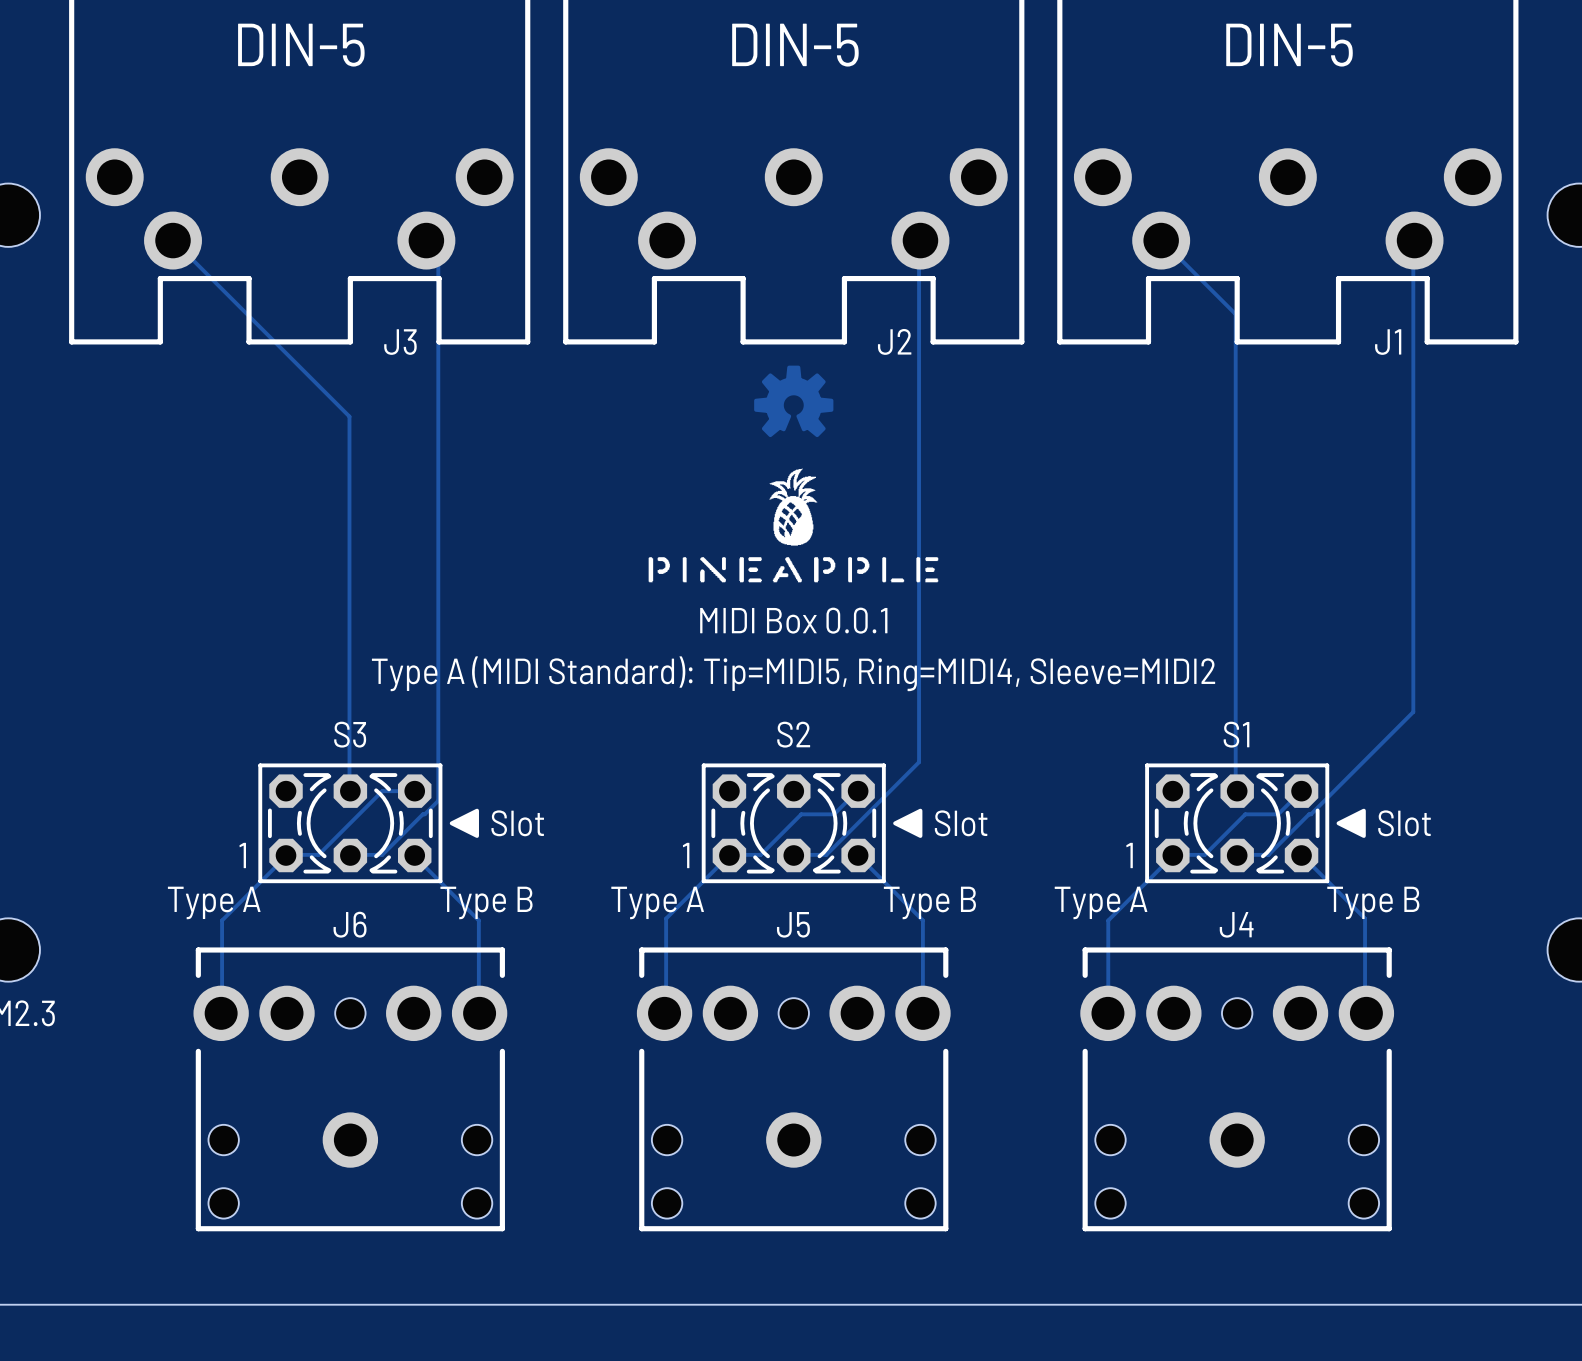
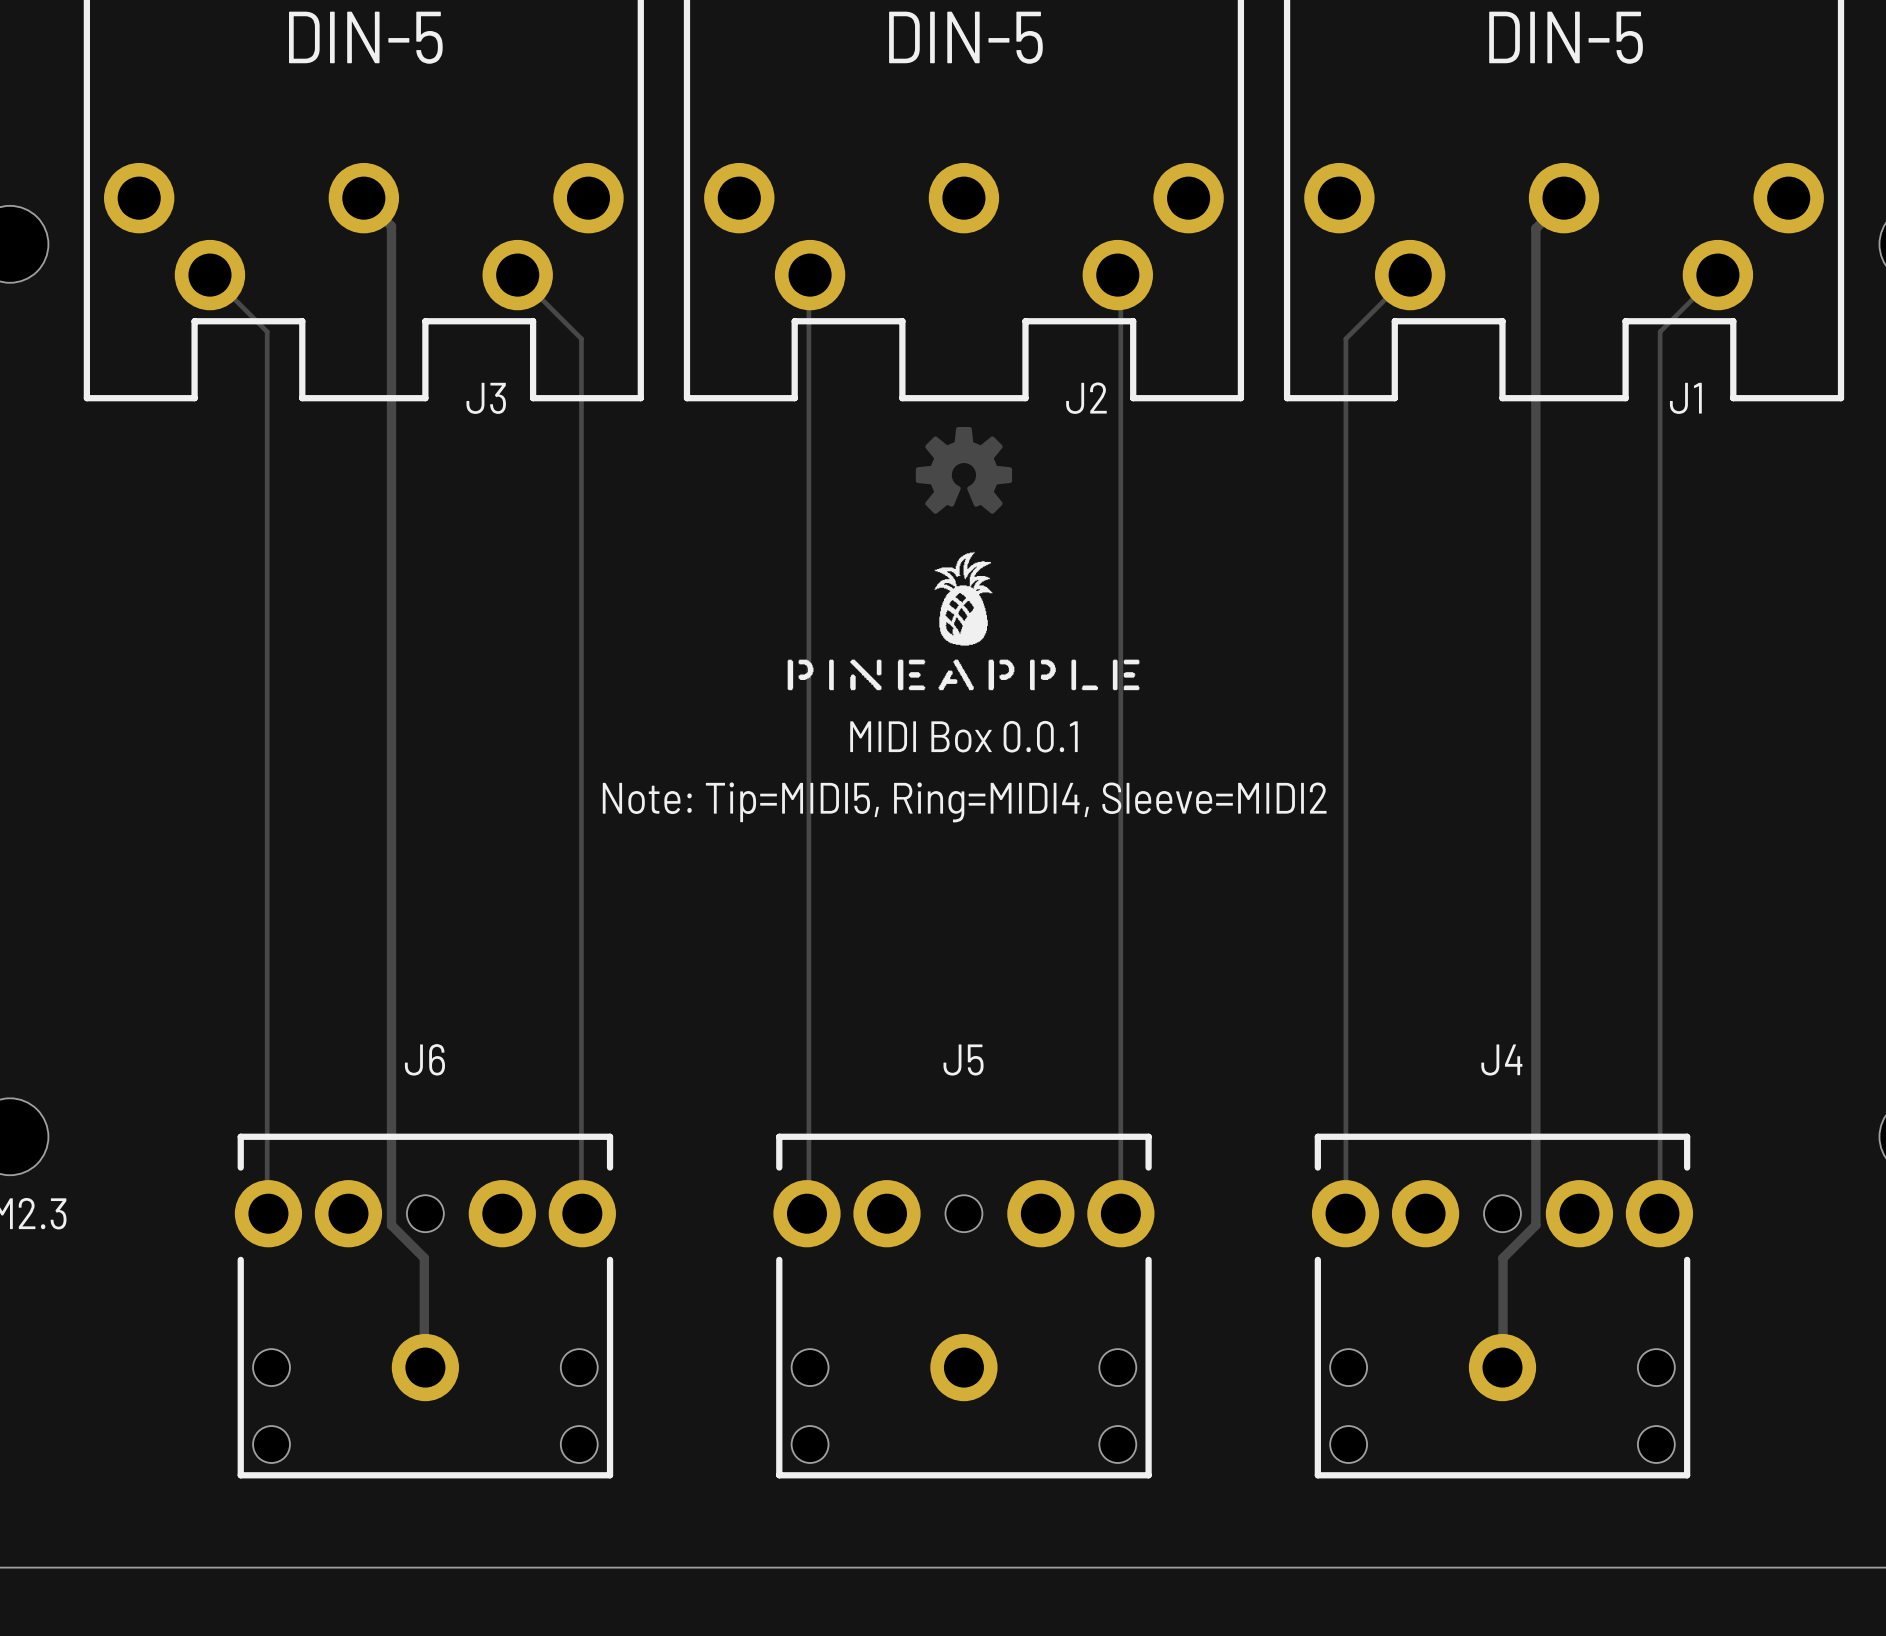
track: none -> (363, 198) (391, 226) (391, 1225) (424, 1258) (425, 1367)
track: none -> (1564, 198) (1564, 200) (1535, 228) (1535, 1225) (1503, 1258) (1502, 1367)
track: (920, 240) (919, 762) (826, 854) (793, 855) -> (1117, 275) (1120, 277) (1120, 1100)
track: (1161, 240) (1235, 314) (1237, 791) -> (1410, 275) (1345, 338) (1345, 1100)
track: (1413, 240) (1413, 712) (1268, 854) (1237, 855) -> (1716, 275) (1660, 331) (1659, 1213)
track: (438, 252) (438, 800) (382, 854) (350, 855) -> (532, 289) (581, 338) (581, 1100)
track: (220, 287) (349, 416) (350, 791) -> (267, 331) (268, 1213)
text: Type A (MIDI Standard): Tip=MIDI5, Ring=MIDI4, Sleeve=MIDI2 (793, 673) -> Note: Tip=MIDI5, Ring=MIDI4, Sleeve=MIDI2 (964, 802)
track: (414, 791) (382, 791) (318, 854) (286, 855) (222, 920) (221, 1013) -> none
track: (858, 791) (834, 814) (801, 814) (760, 854) (729, 854) (666, 918) -> (810, 275) (808, 1098)
track: (1301, 791) (1278, 814) (1245, 814) (1204, 854) (1172, 855) (1108, 920) -> none
drawing: [449, 808, 479, 838] -> none
drawing: [893, 808, 923, 838] -> none
drawing: [1336, 808, 1366, 838] -> none
S3: (350, 823) -> none
text: Slot (517, 823) -> none
S2: (793, 823) -> none
text: Slot (961, 823) -> none
S1: (1237, 823) -> none
text: Slot (1404, 823) -> none
text: 1 (242, 855) -> none
track: (414, 855) (478, 920) -> none
text: 1 (686, 855) -> none
track: (858, 855) (922, 920) -> none
text: 1 (1129, 855) -> none
track: (1301, 855) (1365, 918) (1366, 1013) -> none
text: Type A (214, 902) -> none
text: Type B (486, 902) -> none
text: Type A (657, 902) -> none
text: Type B (929, 902) -> none
text: Type A (1101, 902) -> none
text: Type B (1373, 902) -> none
J6 name position: J6 (350, 924) -> J6 (424, 1059)
J5 name position: J5 (793, 924) -> J5 (963, 1060)
J4 name position: J4 (1236, 924) -> J4 (1501, 1060)

